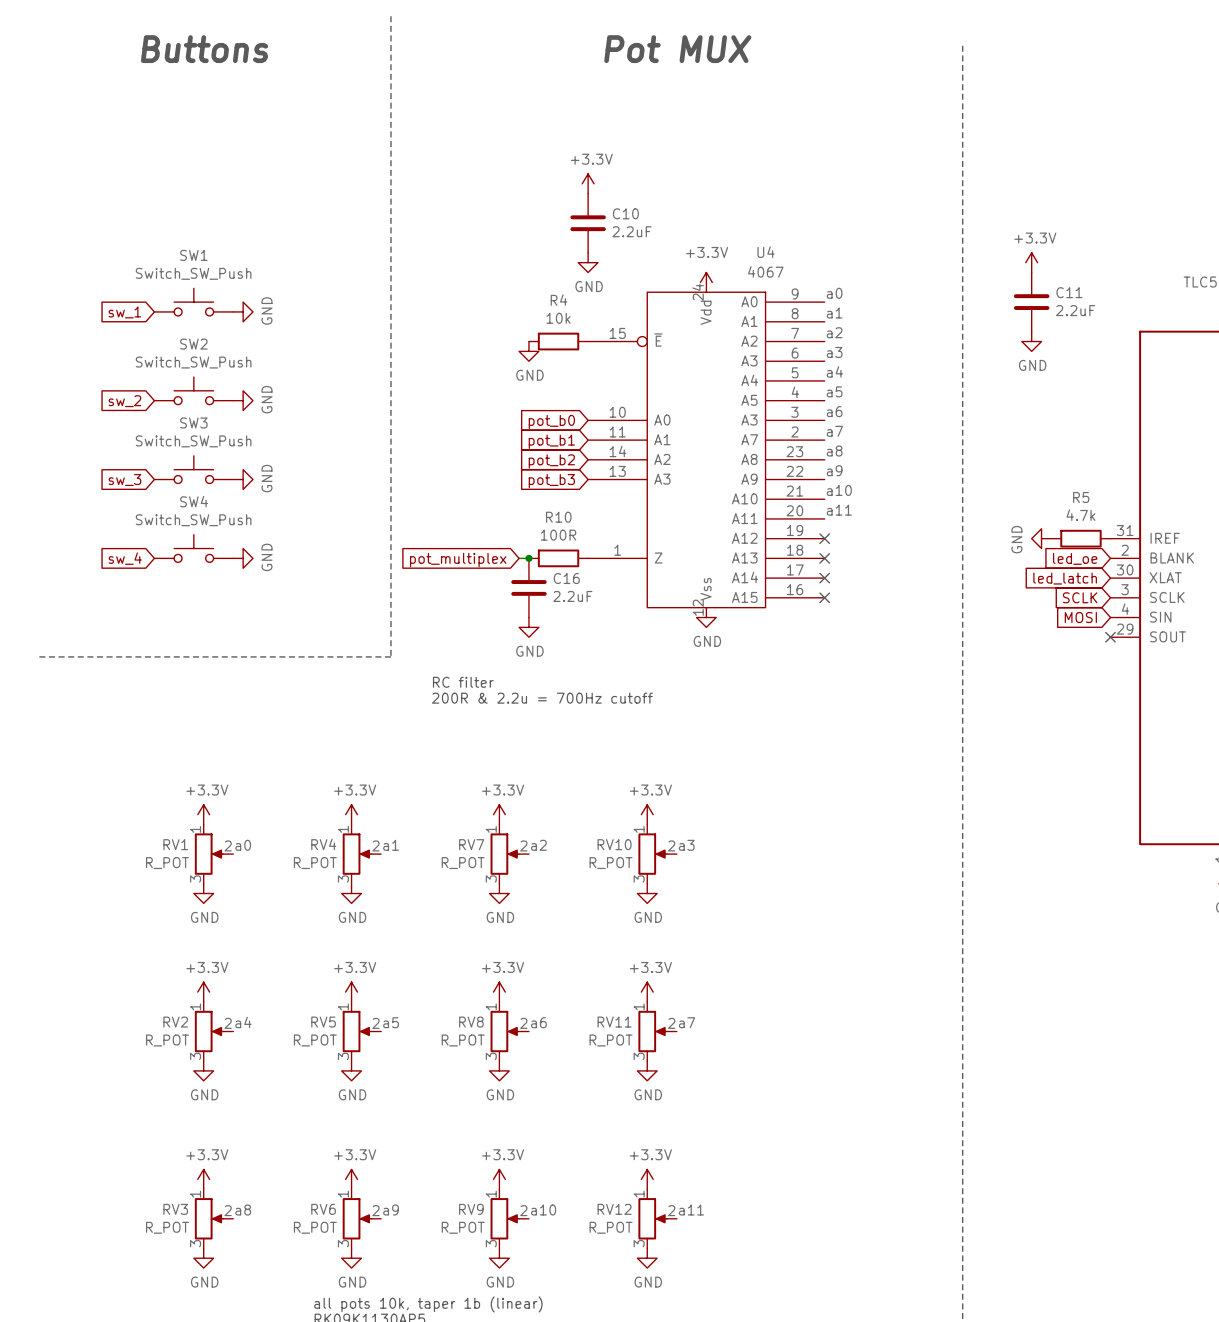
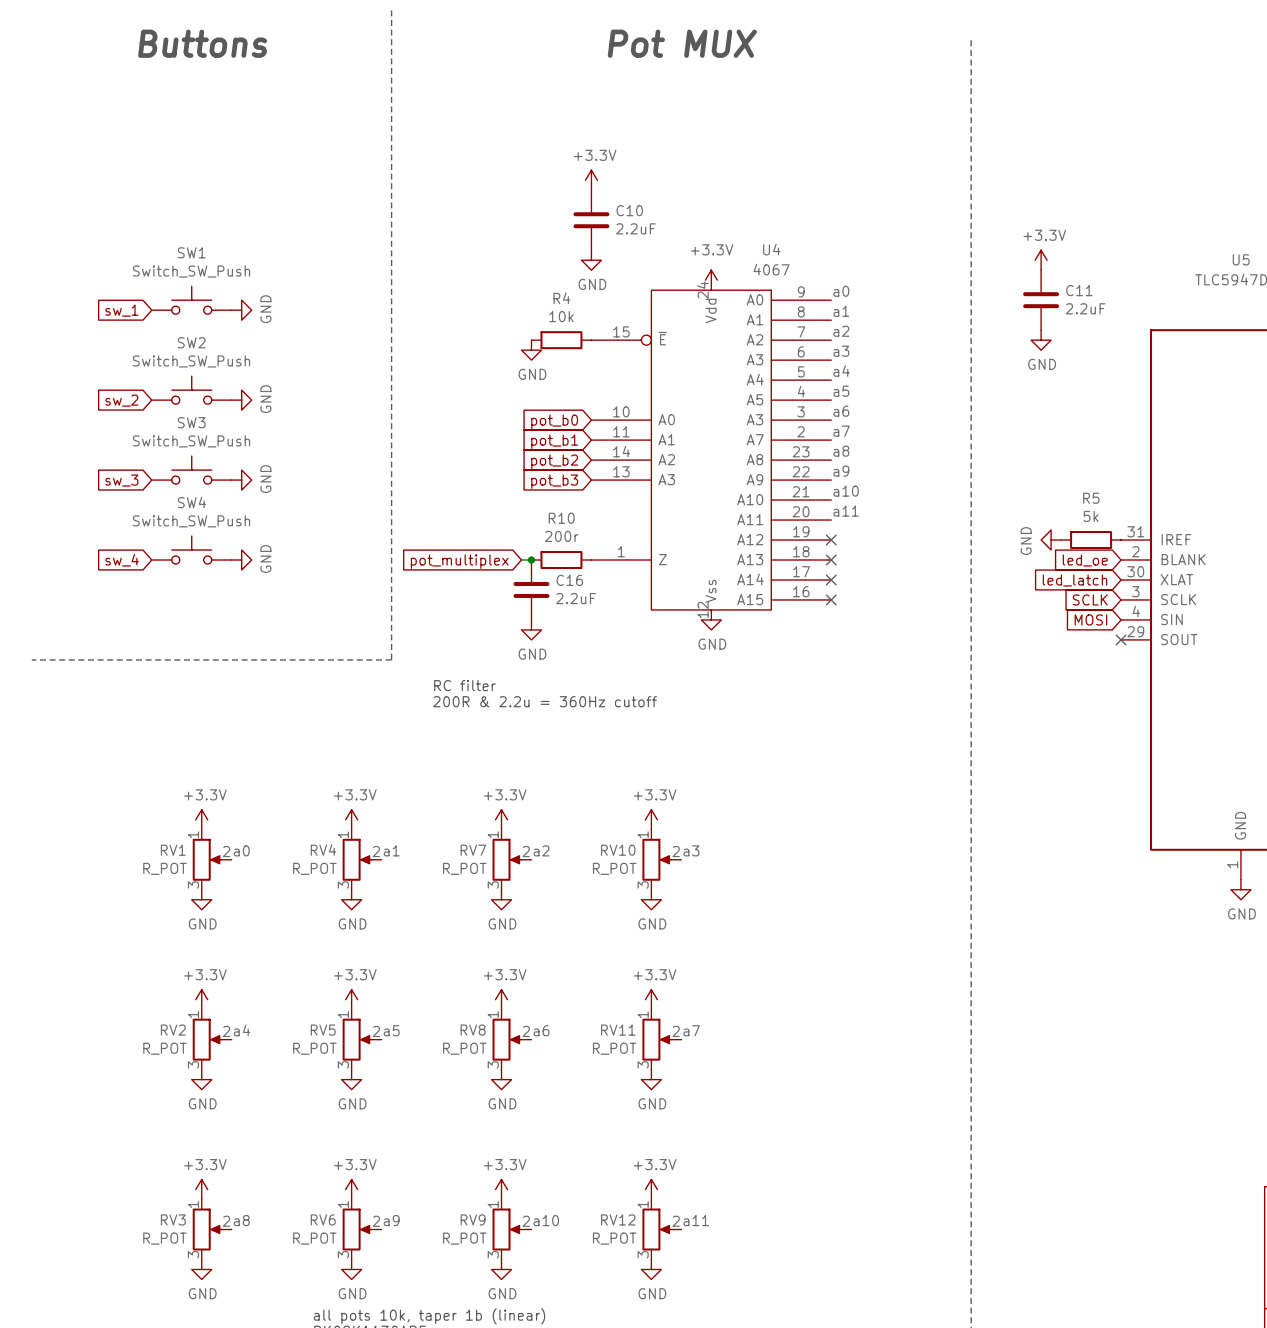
R5 value: 4.7k (1080, 515) -> 5k (1091, 516)
R10 value: 100R (558, 535) -> 200r (561, 536)
text: 200R & 2.2u = 700Hz cutoff (542, 698) -> 200R & 2.2u = 360Hz cutoff (545, 701)

